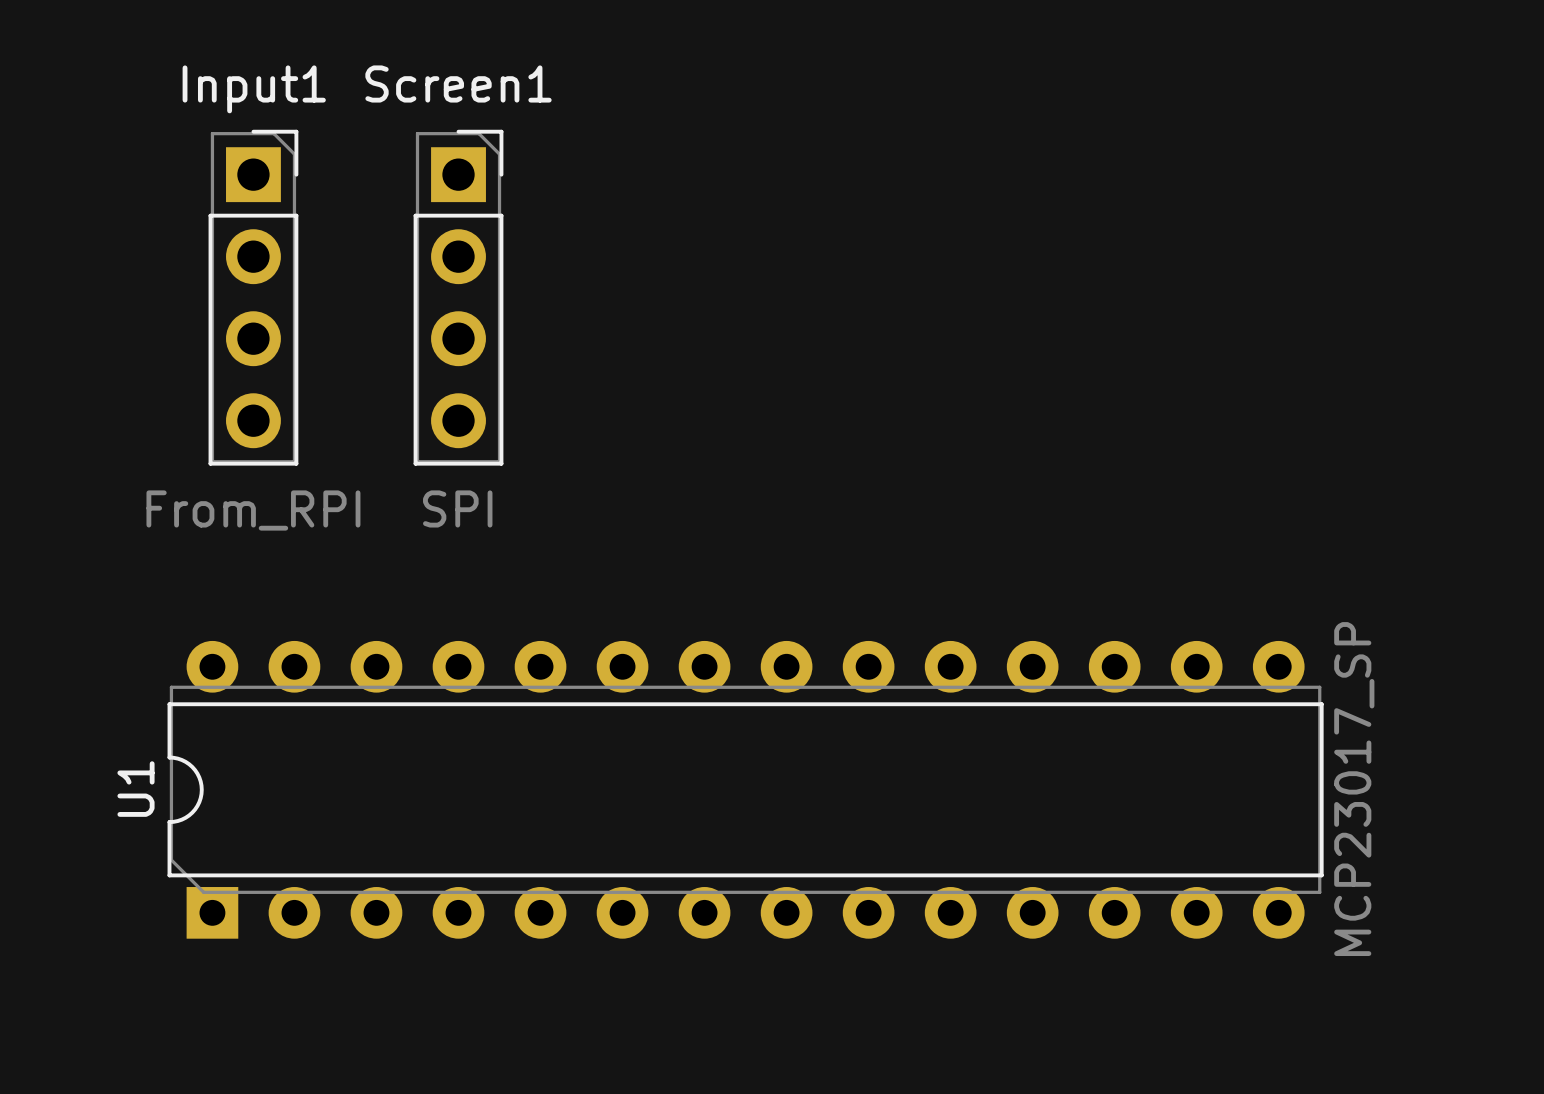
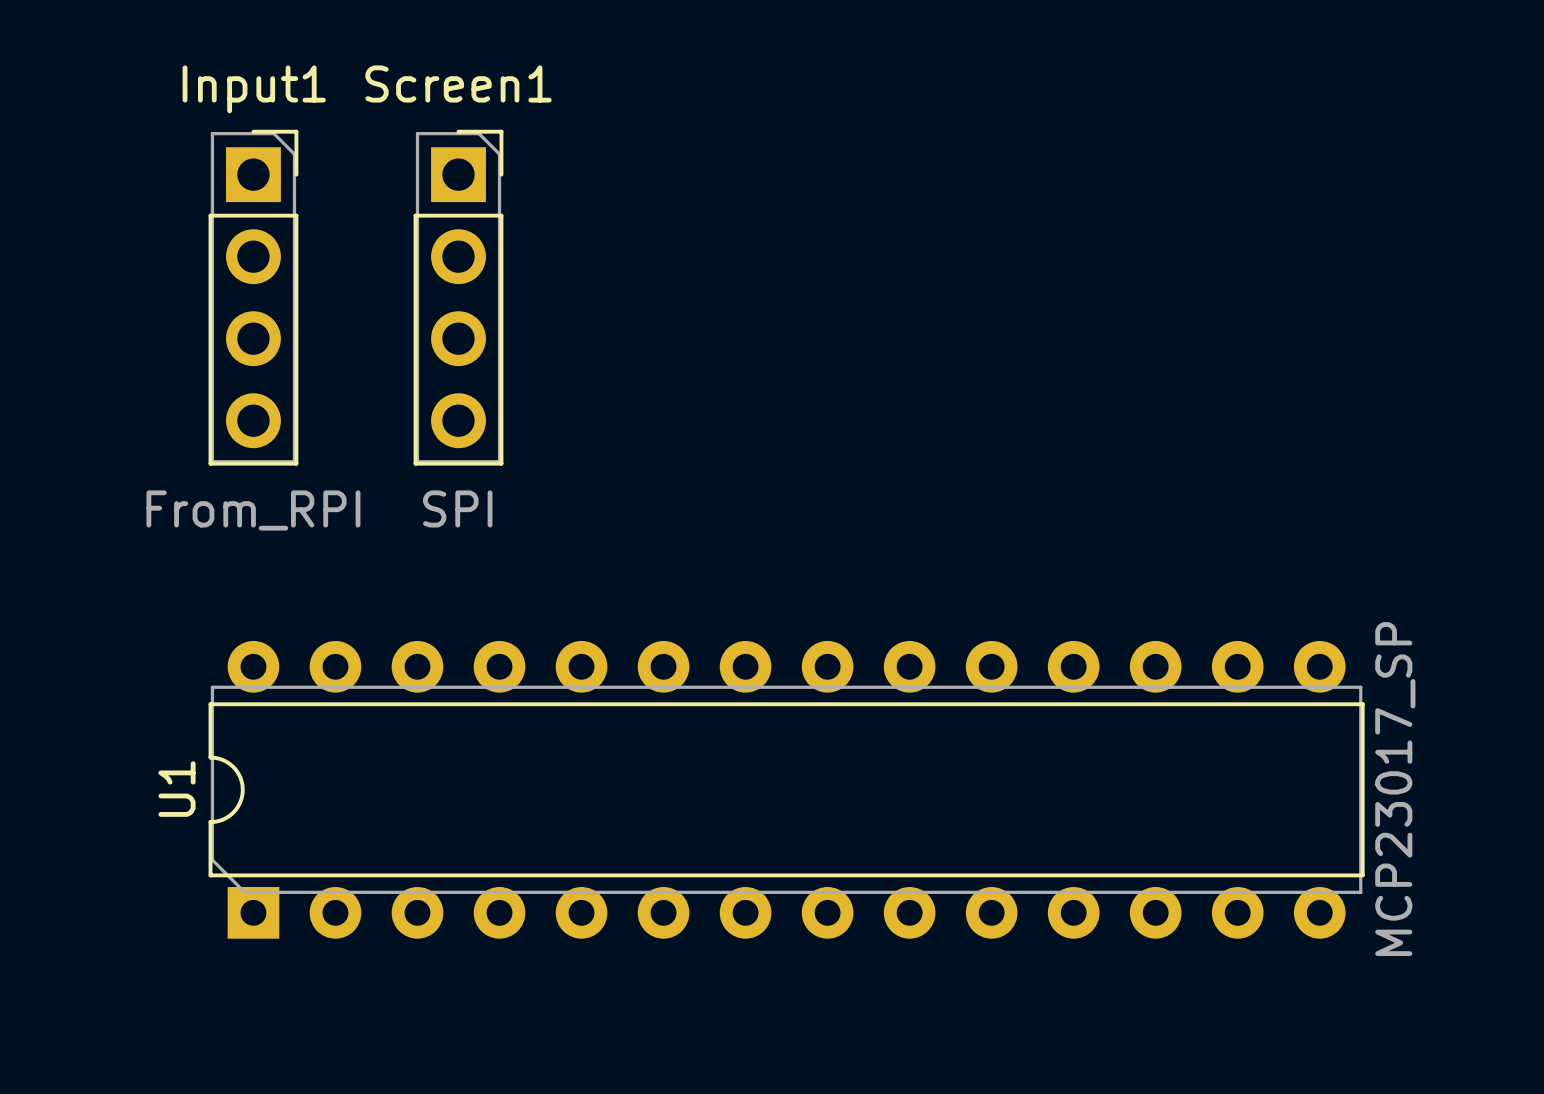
U1 position: (745, 789) -> (786, 789)

